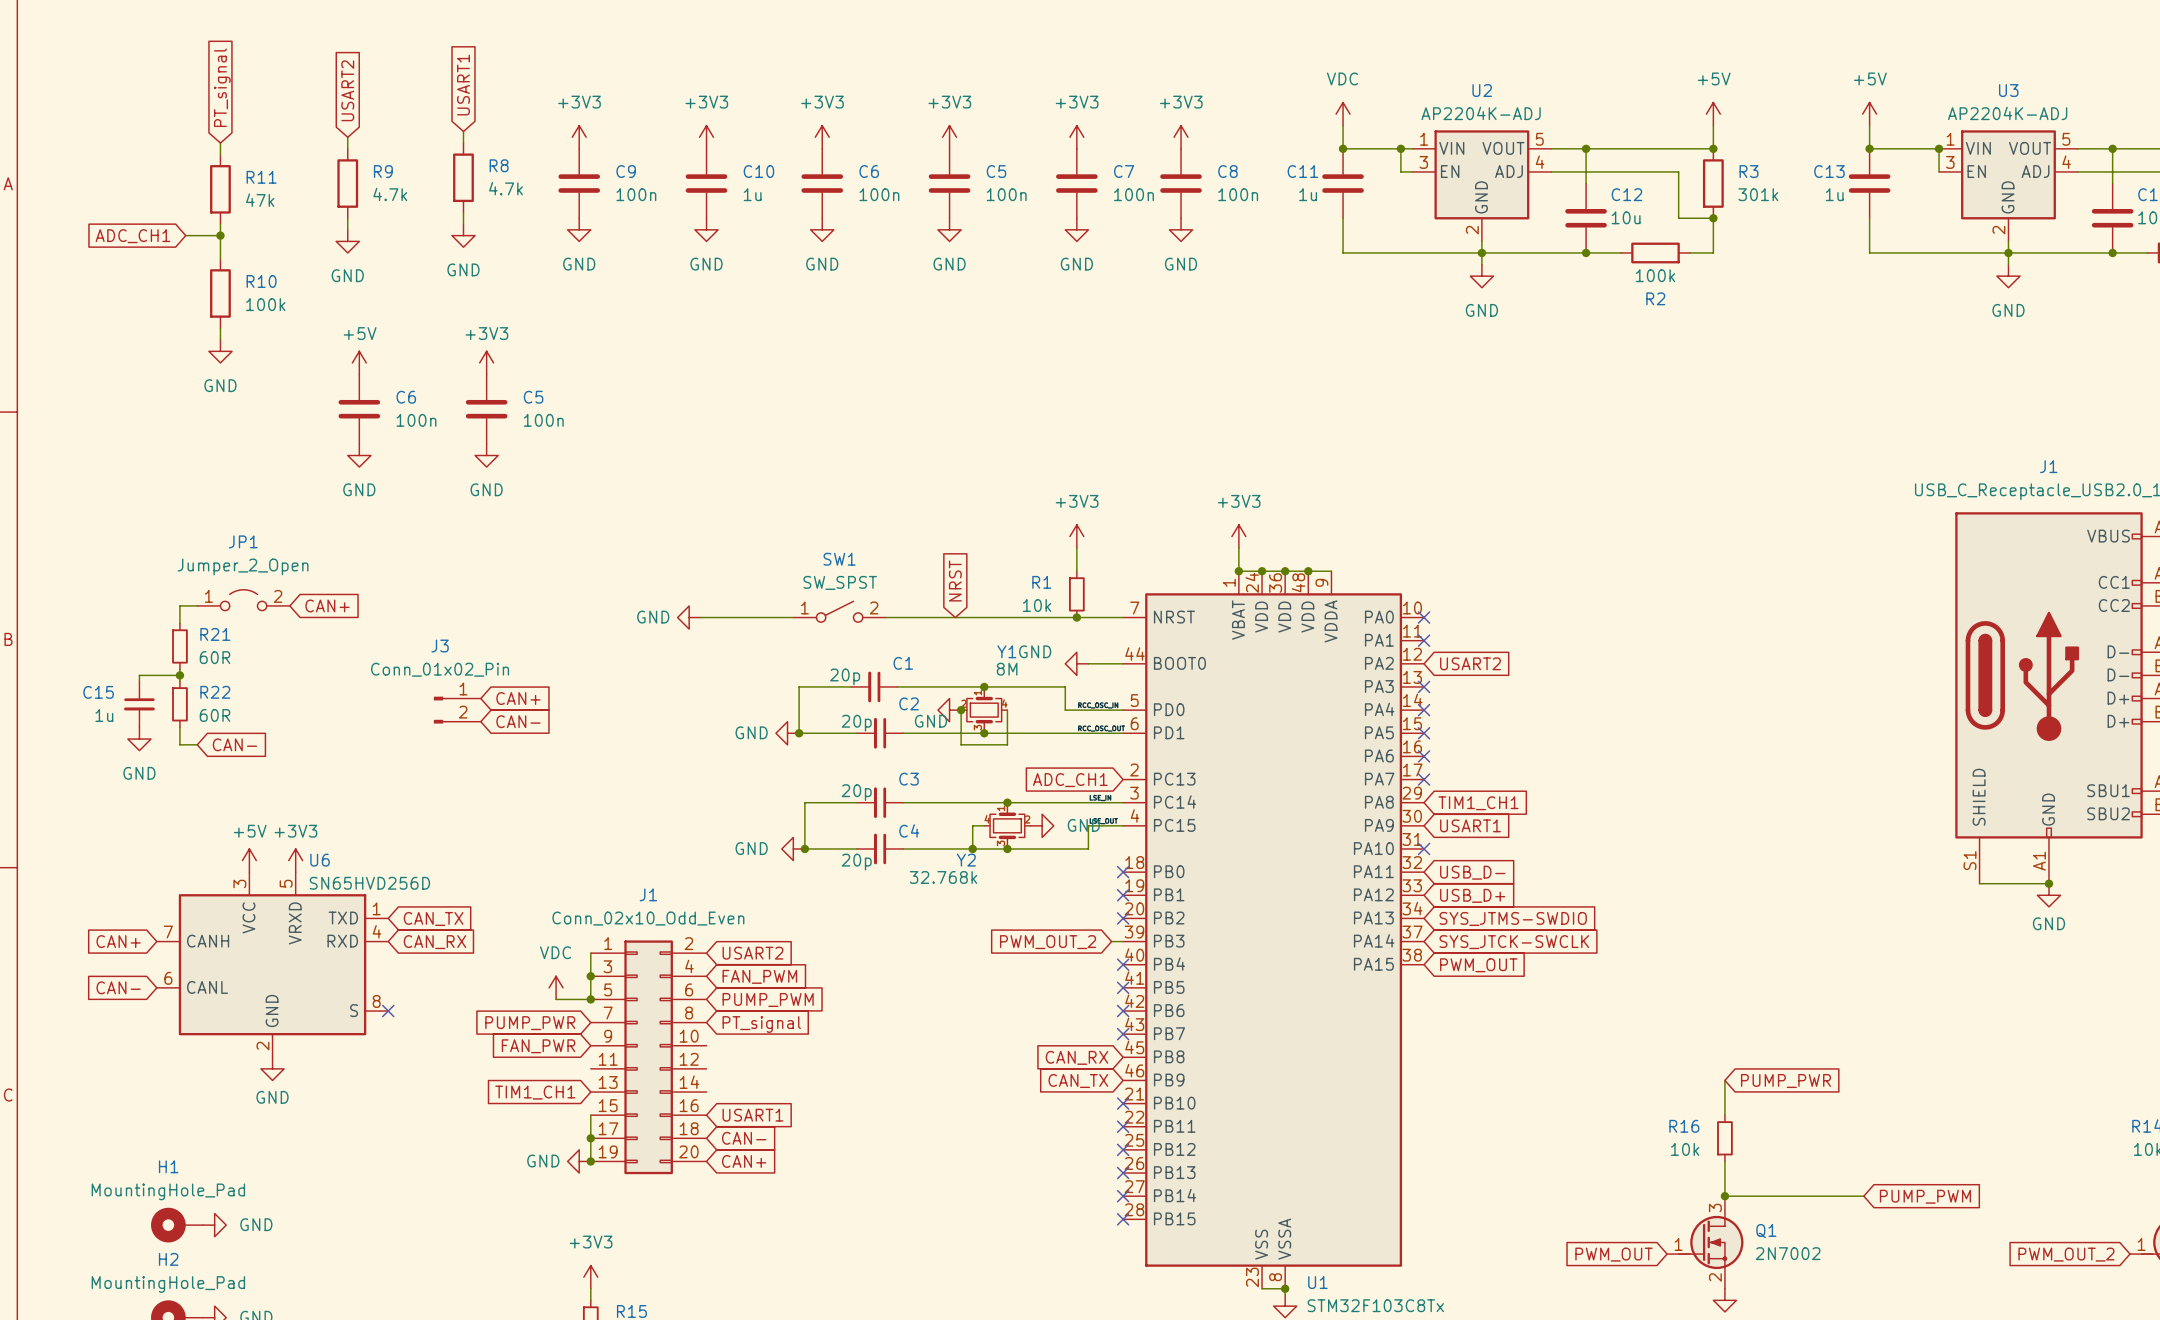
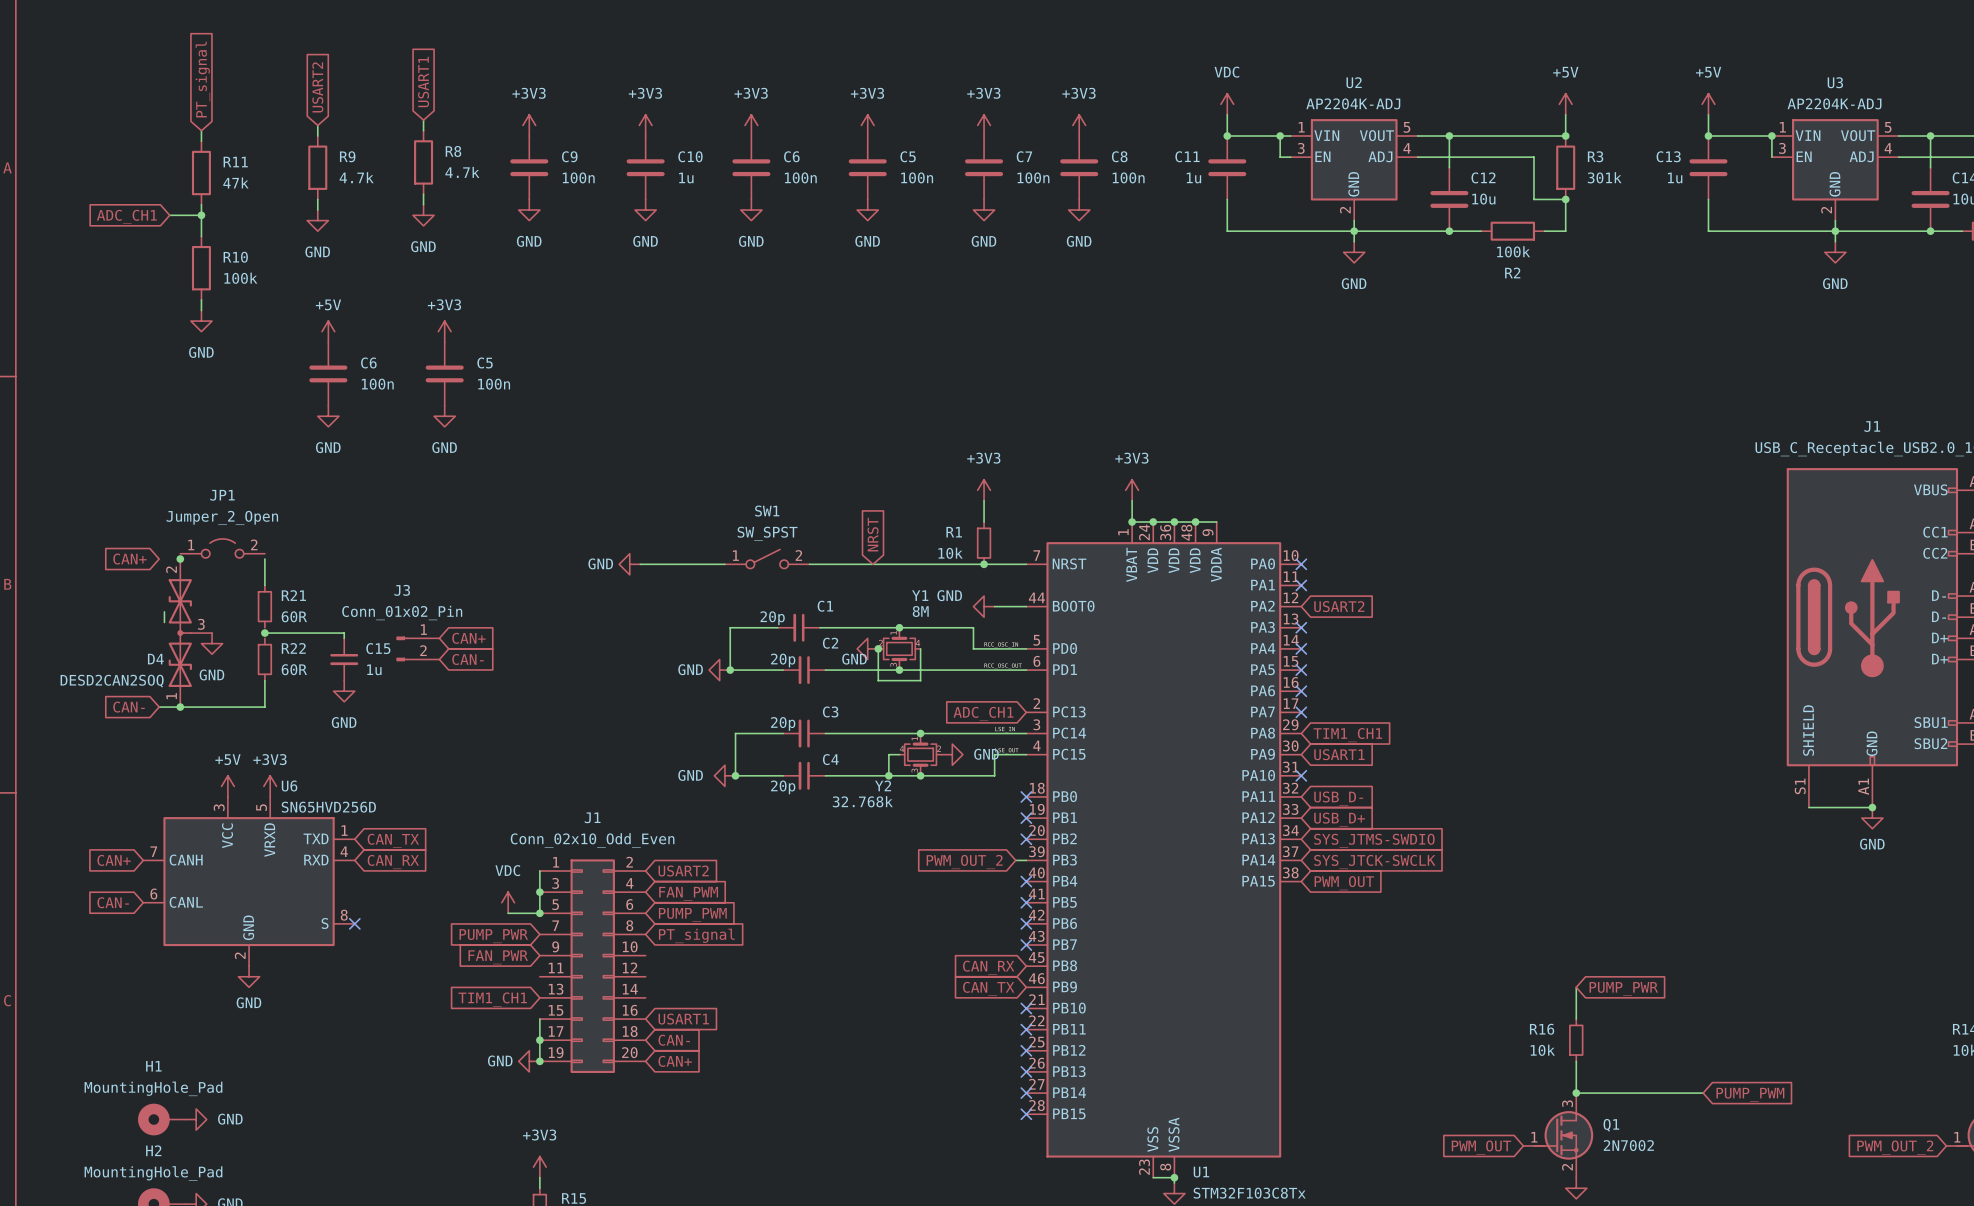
wire: (197, 605) (179, 605) (179, 623) -> none
global label rotation: 0° (327, 605) -> 180° (129, 559)
global label position: CAN+ (327, 605) -> CAN+ (129, 559)
junction: none -> (180, 559)
wire: none -> (264, 559) (264, 585)
R21 position: (179, 646) -> (264, 606)
wire: (179, 675) (139, 675) (139, 681) -> none
junction: (179, 675) -> none
C15 name position: C15 (98, 692) -> C15 (378, 648)
D4: none -> DESD2CAN2SOQ (190, 633)
wire: none -> (264, 633) (344, 633) (344, 638)
junction: none -> (264, 633)
C15 position: (139, 704) -> (344, 659)
R22 position: (179, 704) -> (264, 659)
C15 value position: 1u (104, 715) -> 1u (374, 669)
wire: (179, 727) (179, 744) (197, 744) -> none
power symbol position: GND (139, 739) -> GND (212, 643)
global label rotation: 0° (234, 744) -> 180° (129, 707)
global label position: CAN- (234, 744) -> CAN- (129, 707)
wire: none -> (264, 680) (264, 707) (159, 707)
power symbol: none -> GND (344, 691)
junction: none -> (180, 707)

